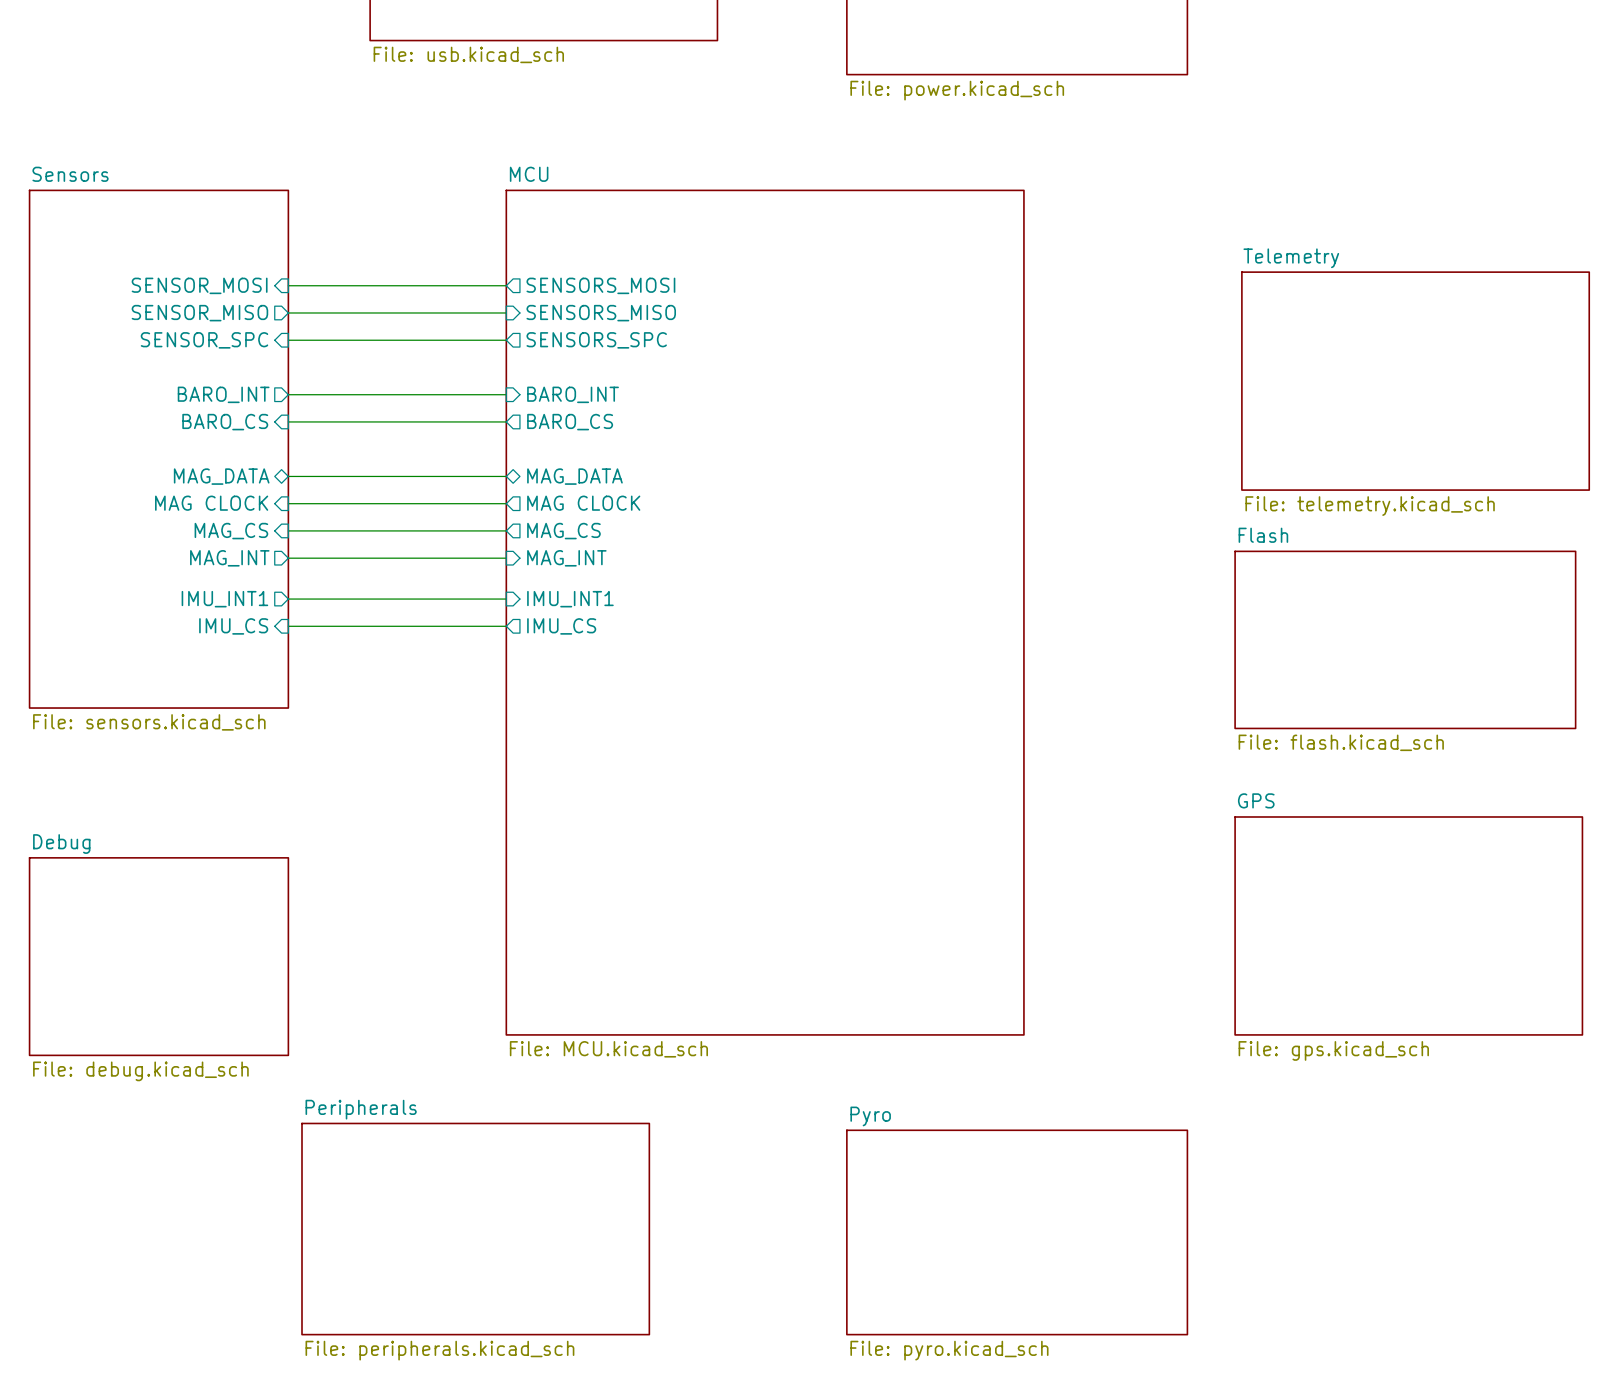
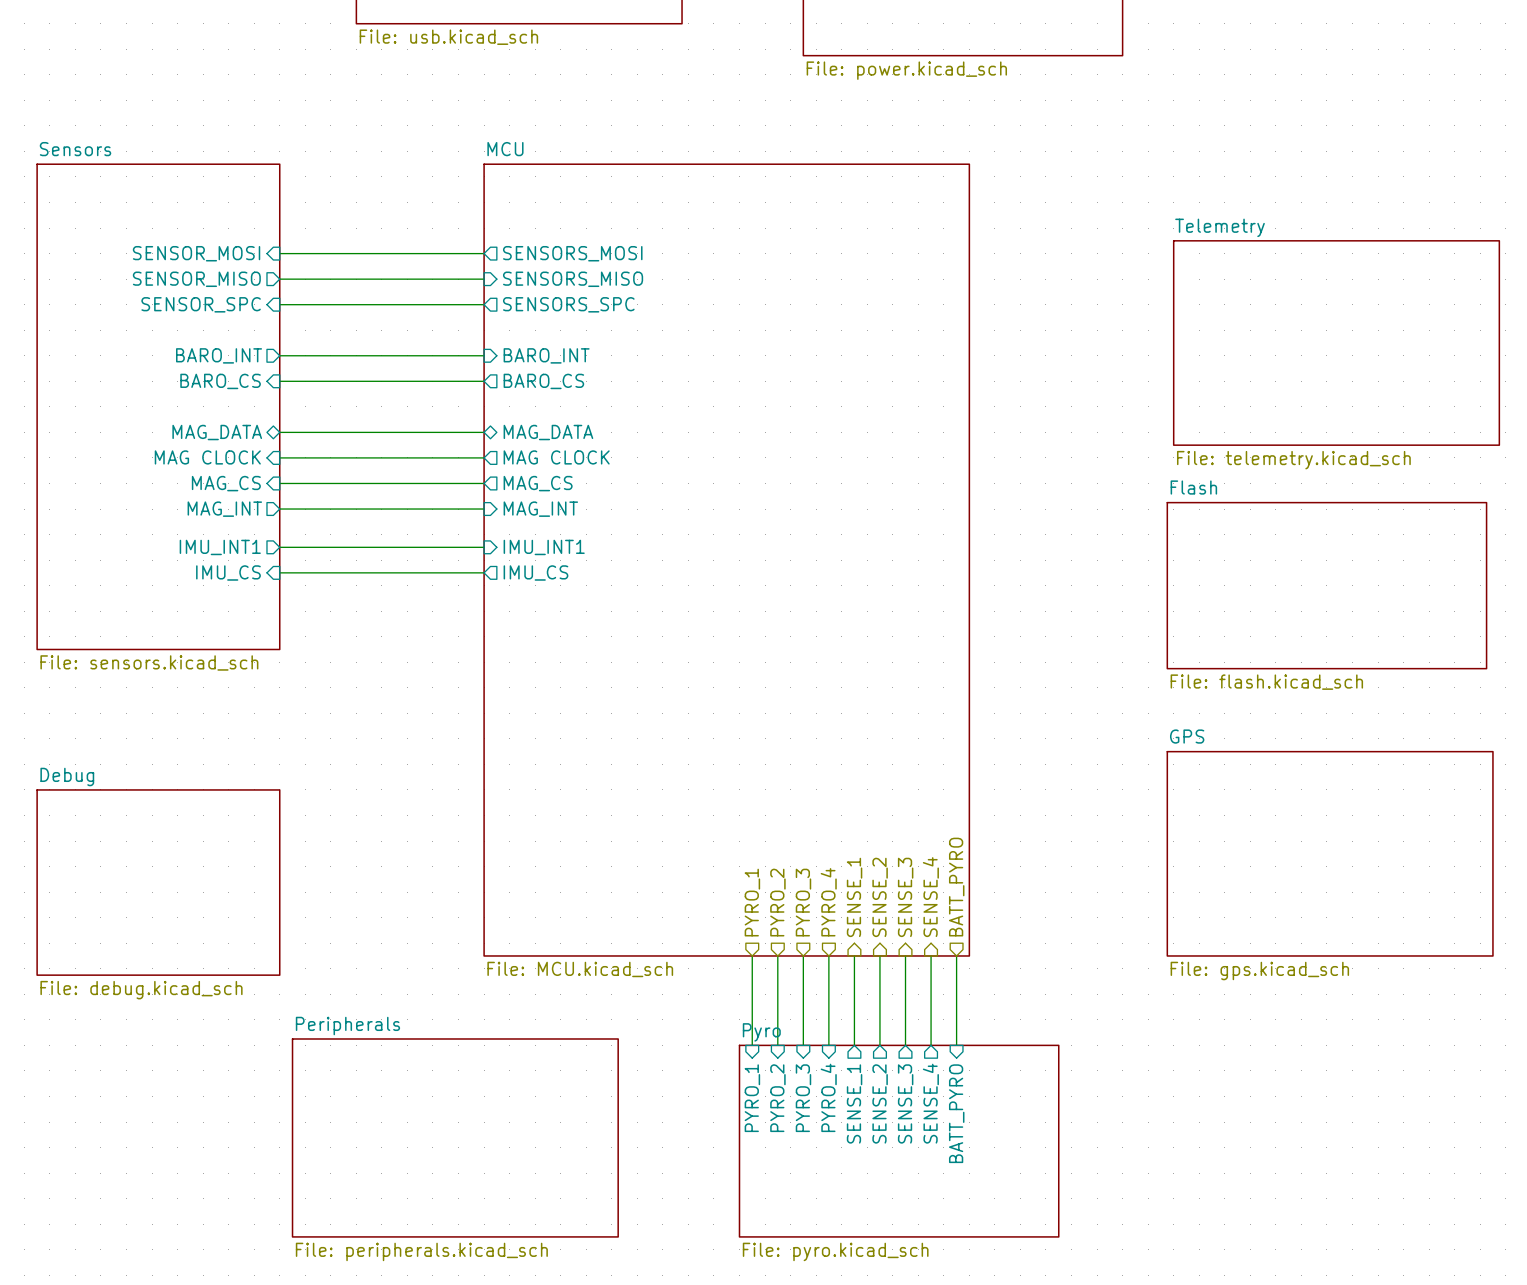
hierarchical label: none -> BATT_PYRO (956, 887)
hierarchical label: none -> SENSE_1 (854, 897)
hierarchical label: none -> SENSE_2 (880, 897)
hierarchical label: none -> SENSE_3 (905, 897)
hierarchical label: none -> SENSE_4 (930, 897)
hierarchical label: none -> PYRO_1 (752, 902)
hierarchical label: none -> PYRO_2 (777, 902)
hierarchical label: none -> PYRO_3 (803, 902)
hierarchical label: none -> PYRO_4 (828, 902)
wire: none -> (752, 955) (752, 1045)
wire: none -> (777, 955) (777, 1045)
wire: none -> (803, 955) (803, 1045)
wire: none -> (828, 955) (828, 1045)
wire: none -> (854, 955) (854, 1045)
wire: none -> (879, 955) (879, 1045)
wire: none -> (905, 955) (905, 1045)
wire: none -> (931, 955) (931, 1045)
wire: none -> (956, 955) (956, 1045)
sheet pin: none -> PYRO_1 (752, 1098)
sheet pin: none -> PYRO_2 (777, 1098)
sheet pin: none -> PYRO_3 (803, 1098)
sheet pin: none -> PYRO_4 (828, 1097)
sheet pin: none -> SENSE_1 (854, 1103)
sheet pin: none -> SENSE_2 (880, 1103)
sheet pin: none -> SENSE_3 (905, 1103)
sheet pin: none -> SENSE_4 (930, 1103)
sheet pin: none -> BATT_PYRO (956, 1113)
sheet Pyro position: (1017, 1232) -> (899, 1141)

